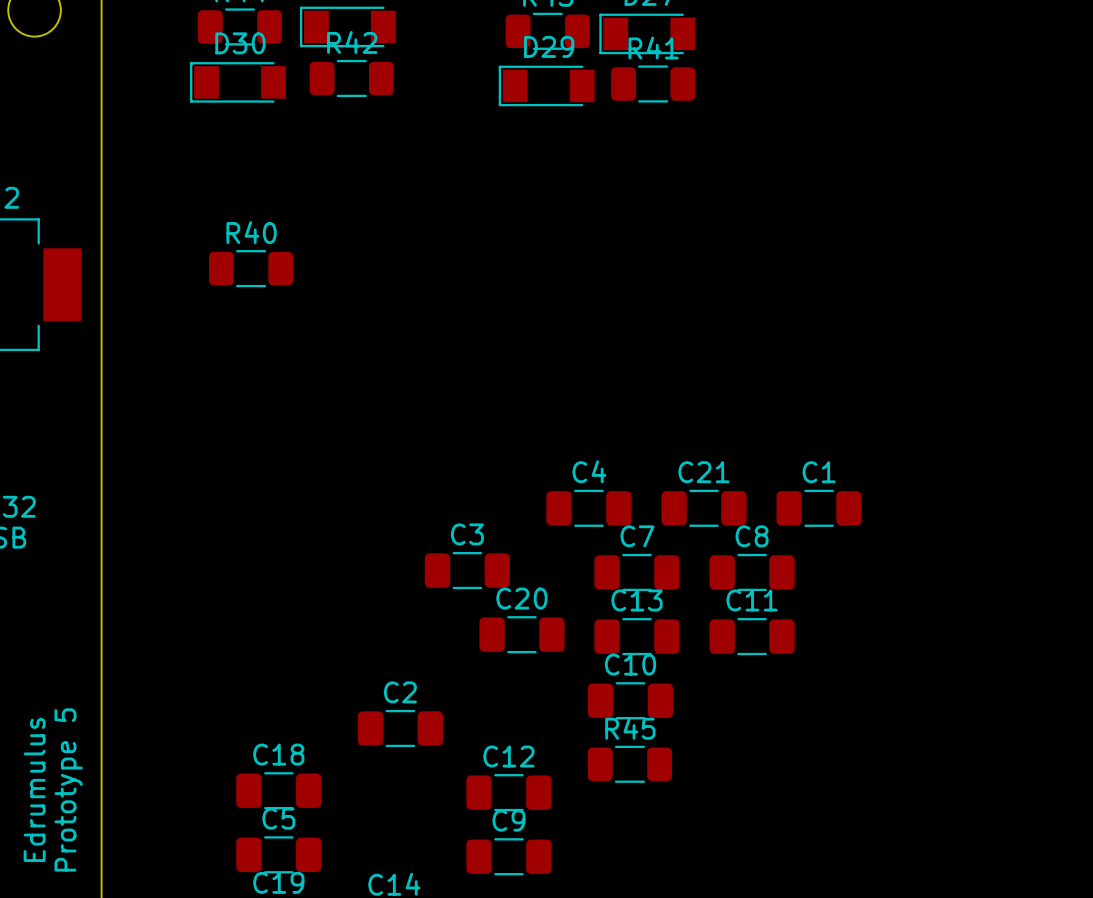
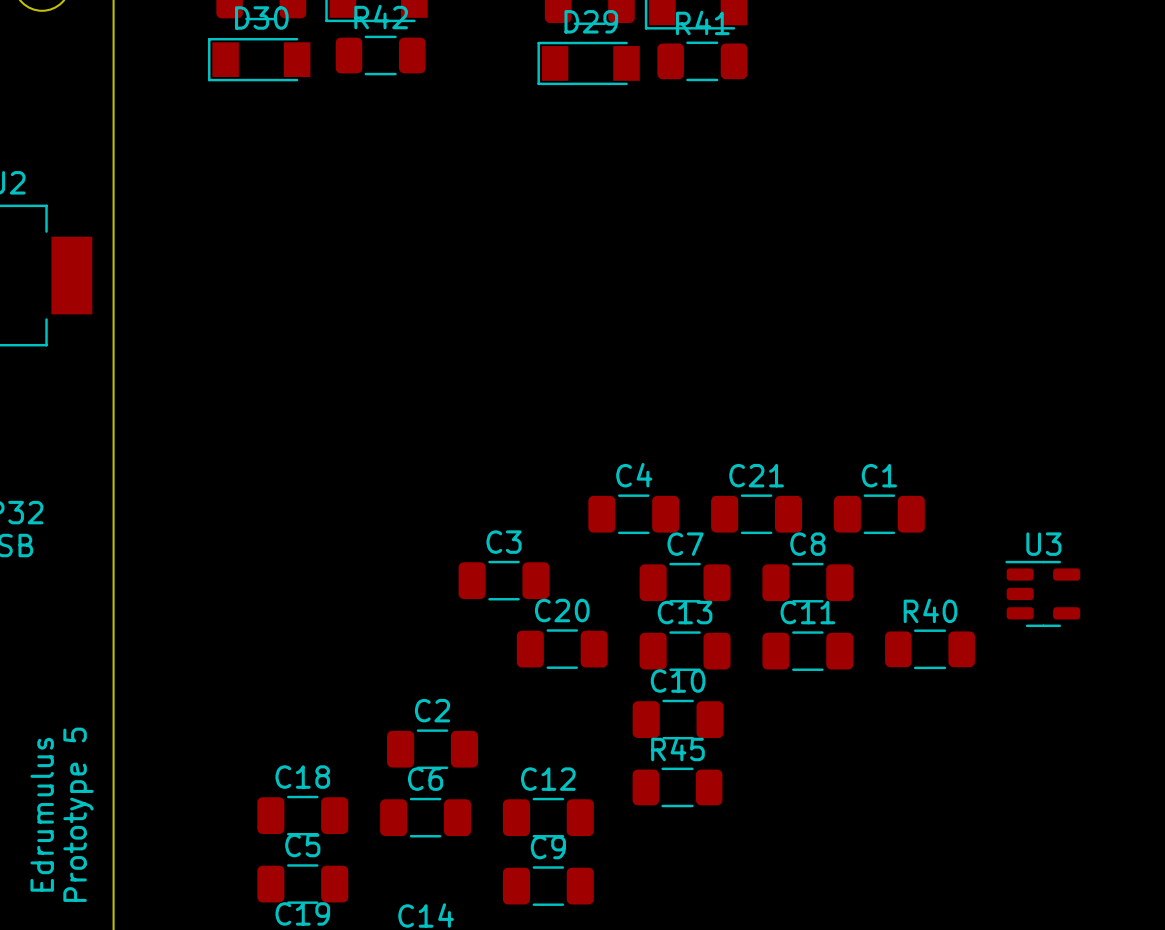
R40 position: (251, 268) -> (930, 649)
U3: none -> (1042, 593)
C6: none -> (425, 817)

